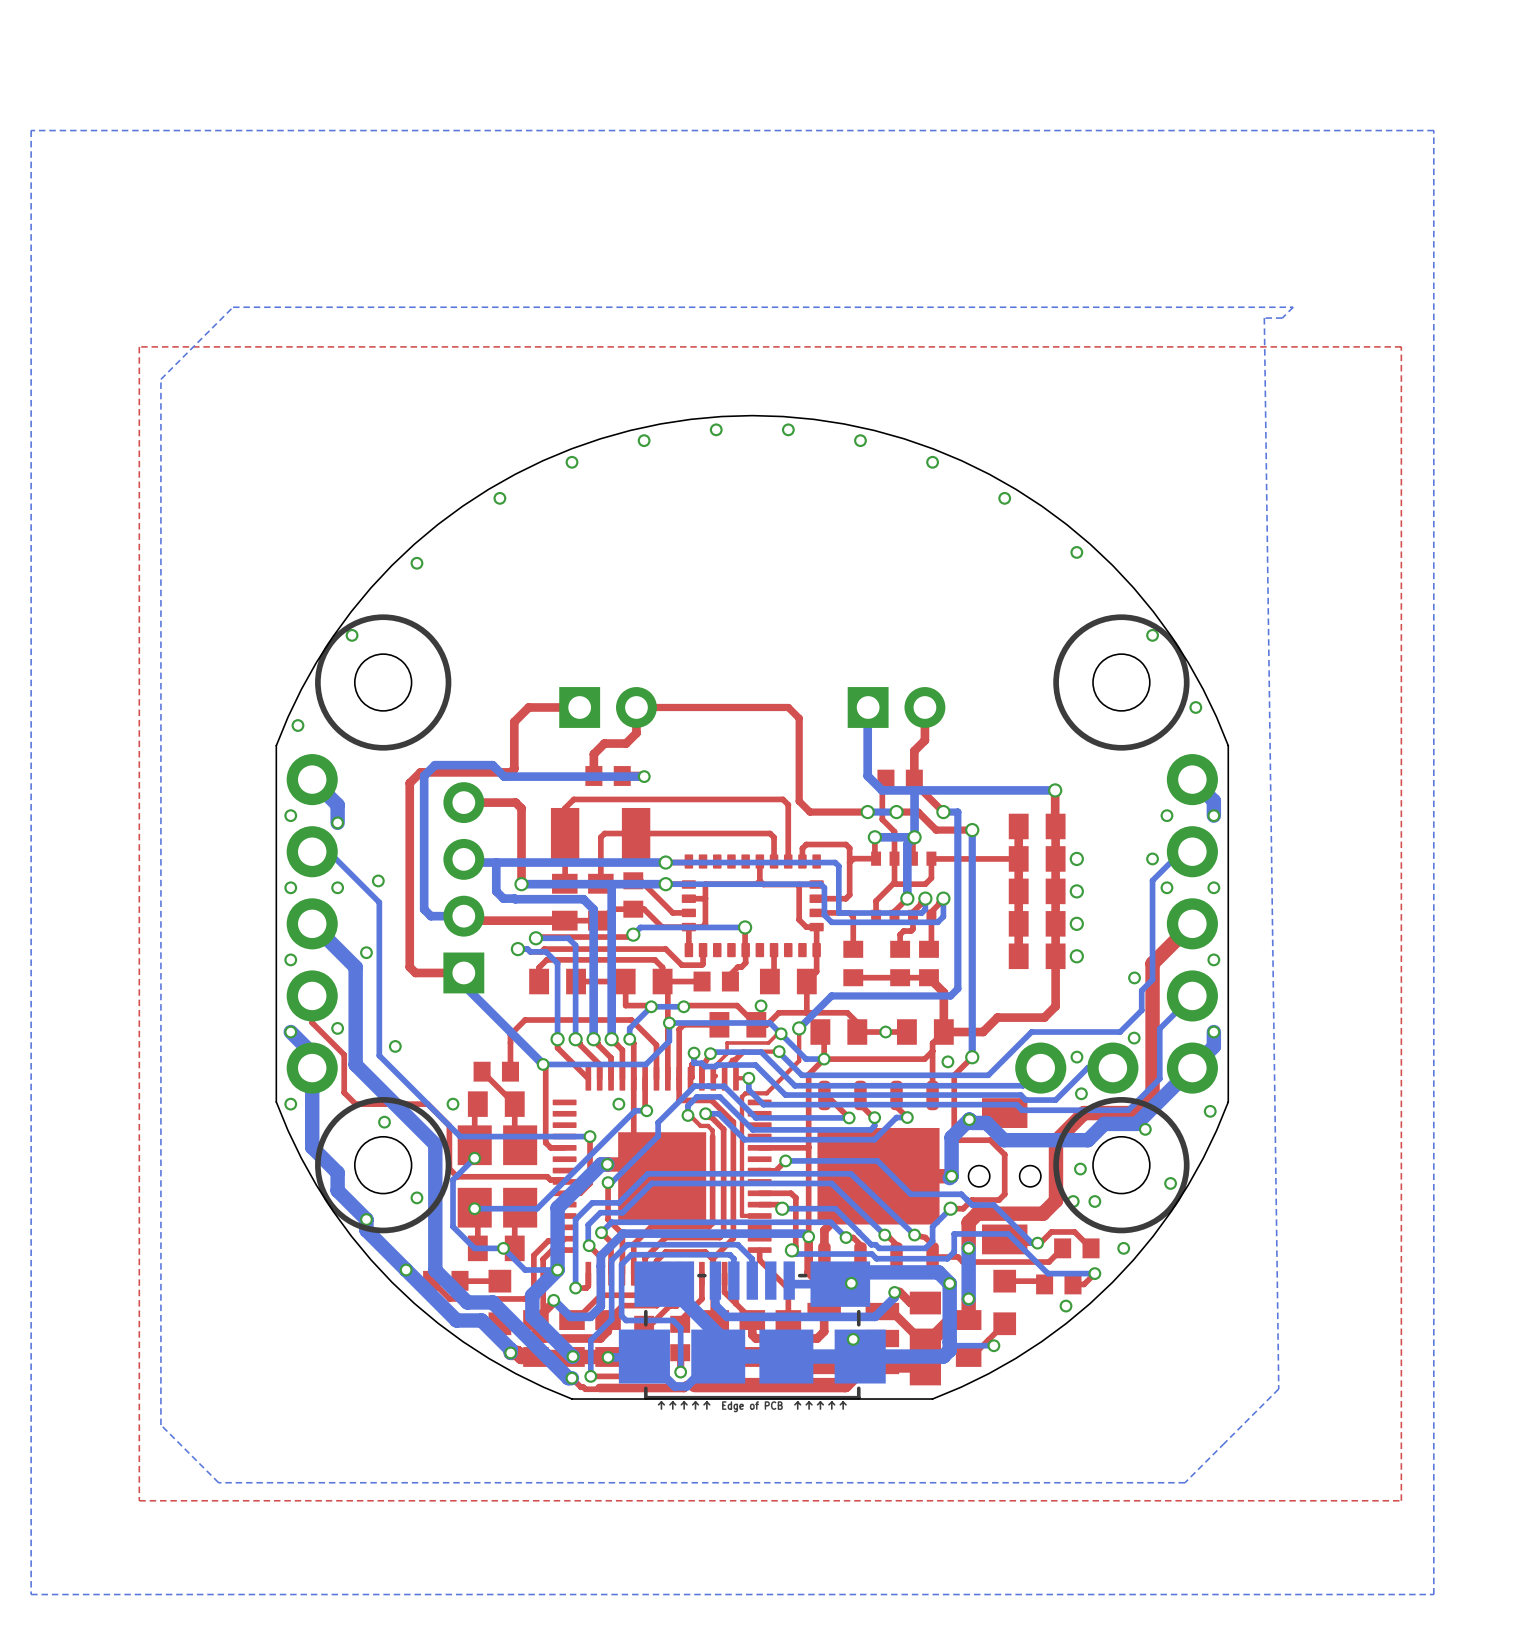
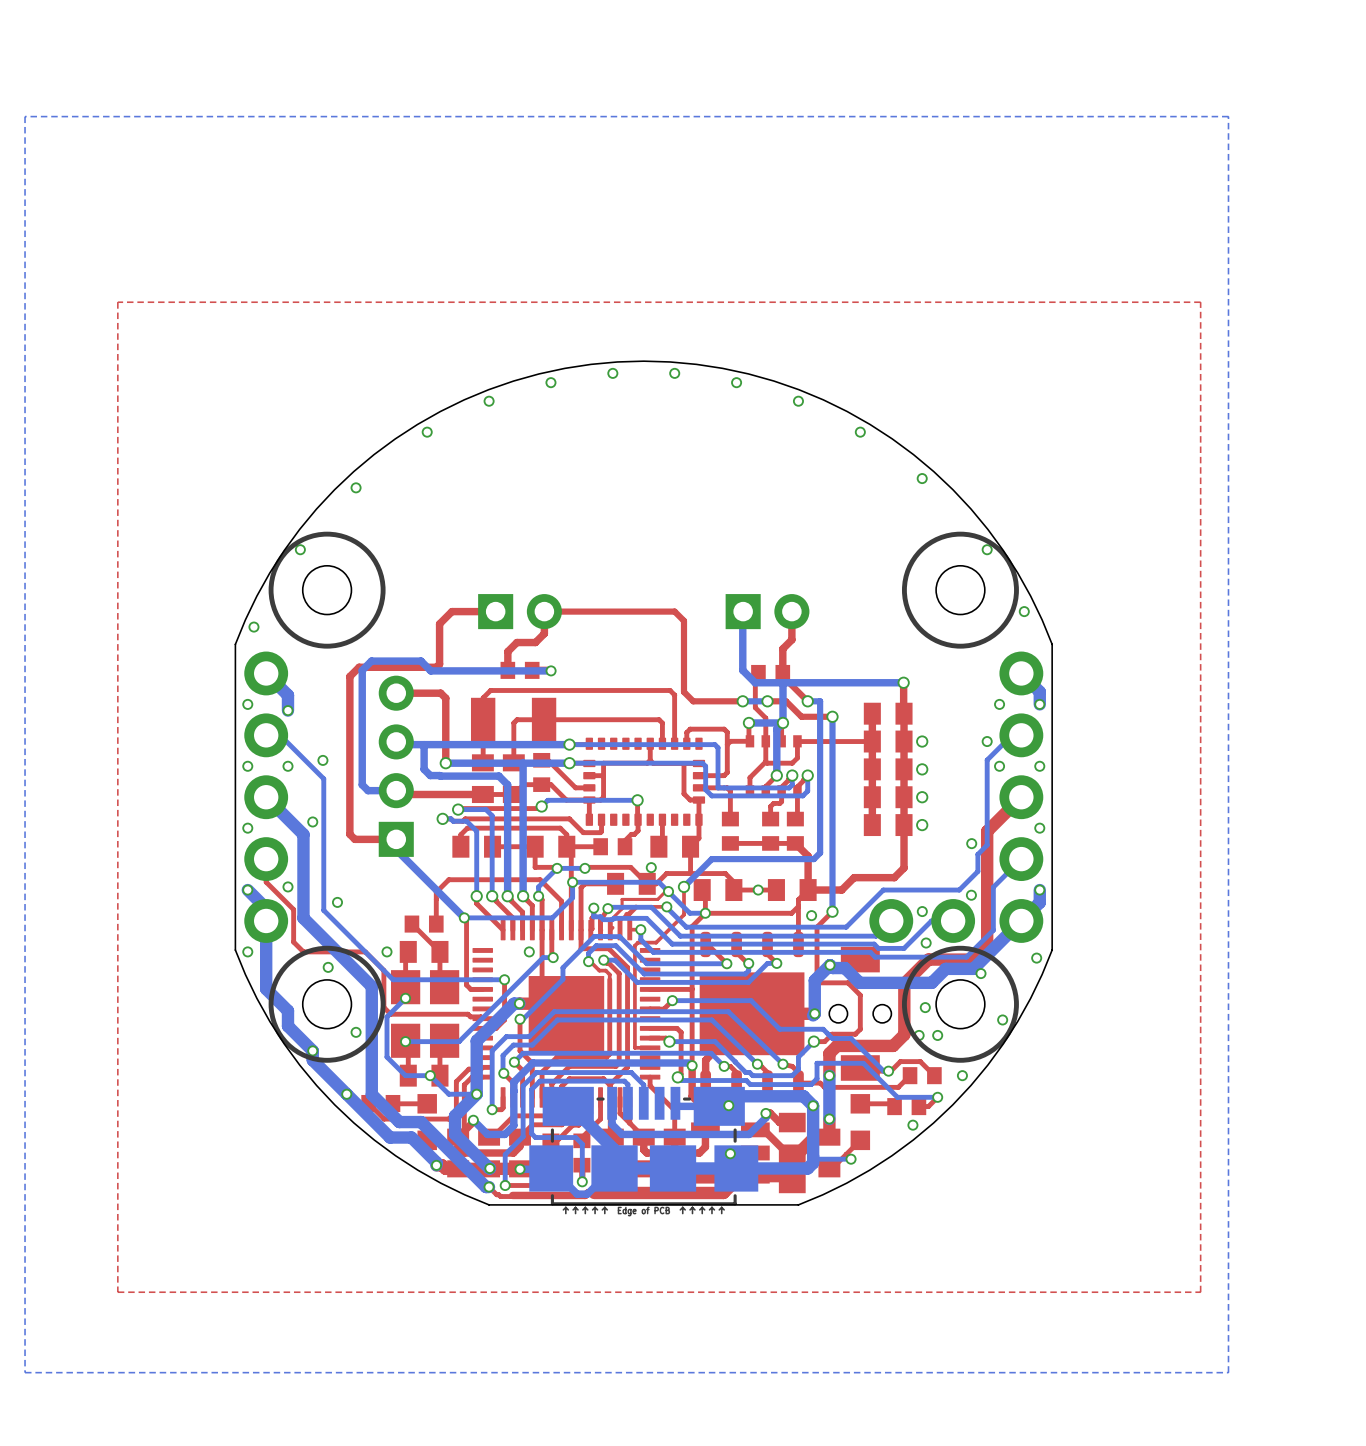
bottom zone outline: (1293, 307) (233, 307) (160, 379) (160, 1425) (218, 1482) (1185, 1482) (1278, 1388) (1264, 318) (1282, 318) (1293, 307) -> none

